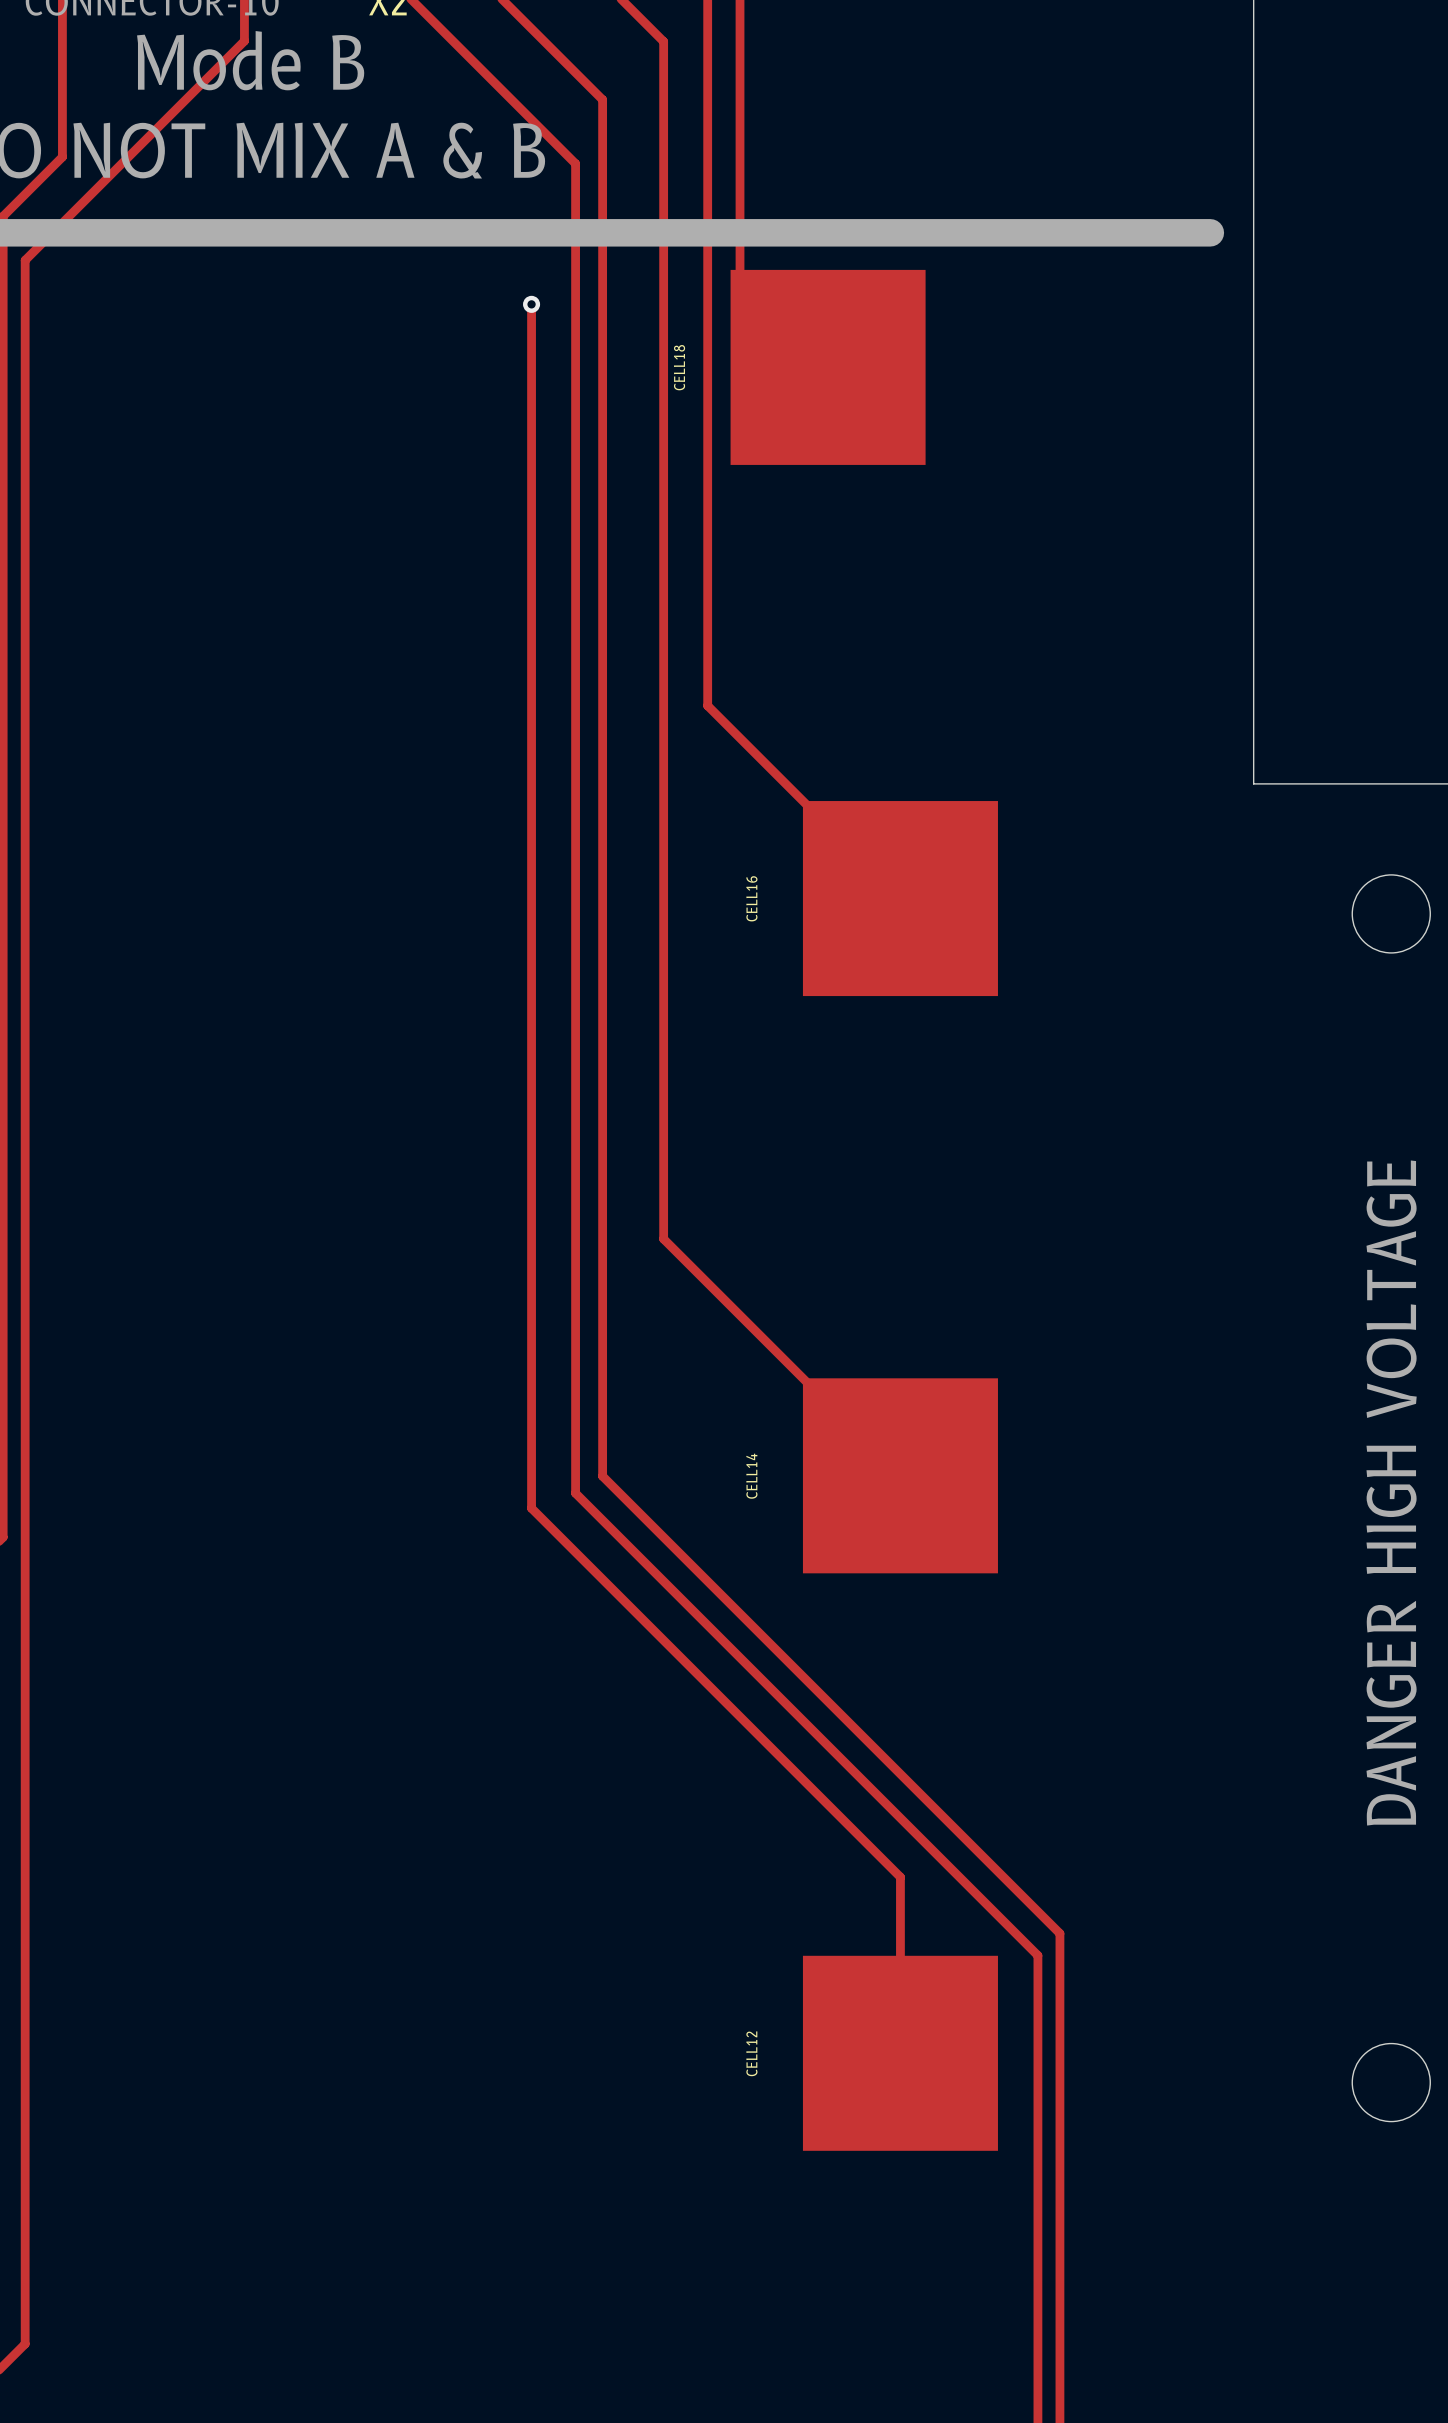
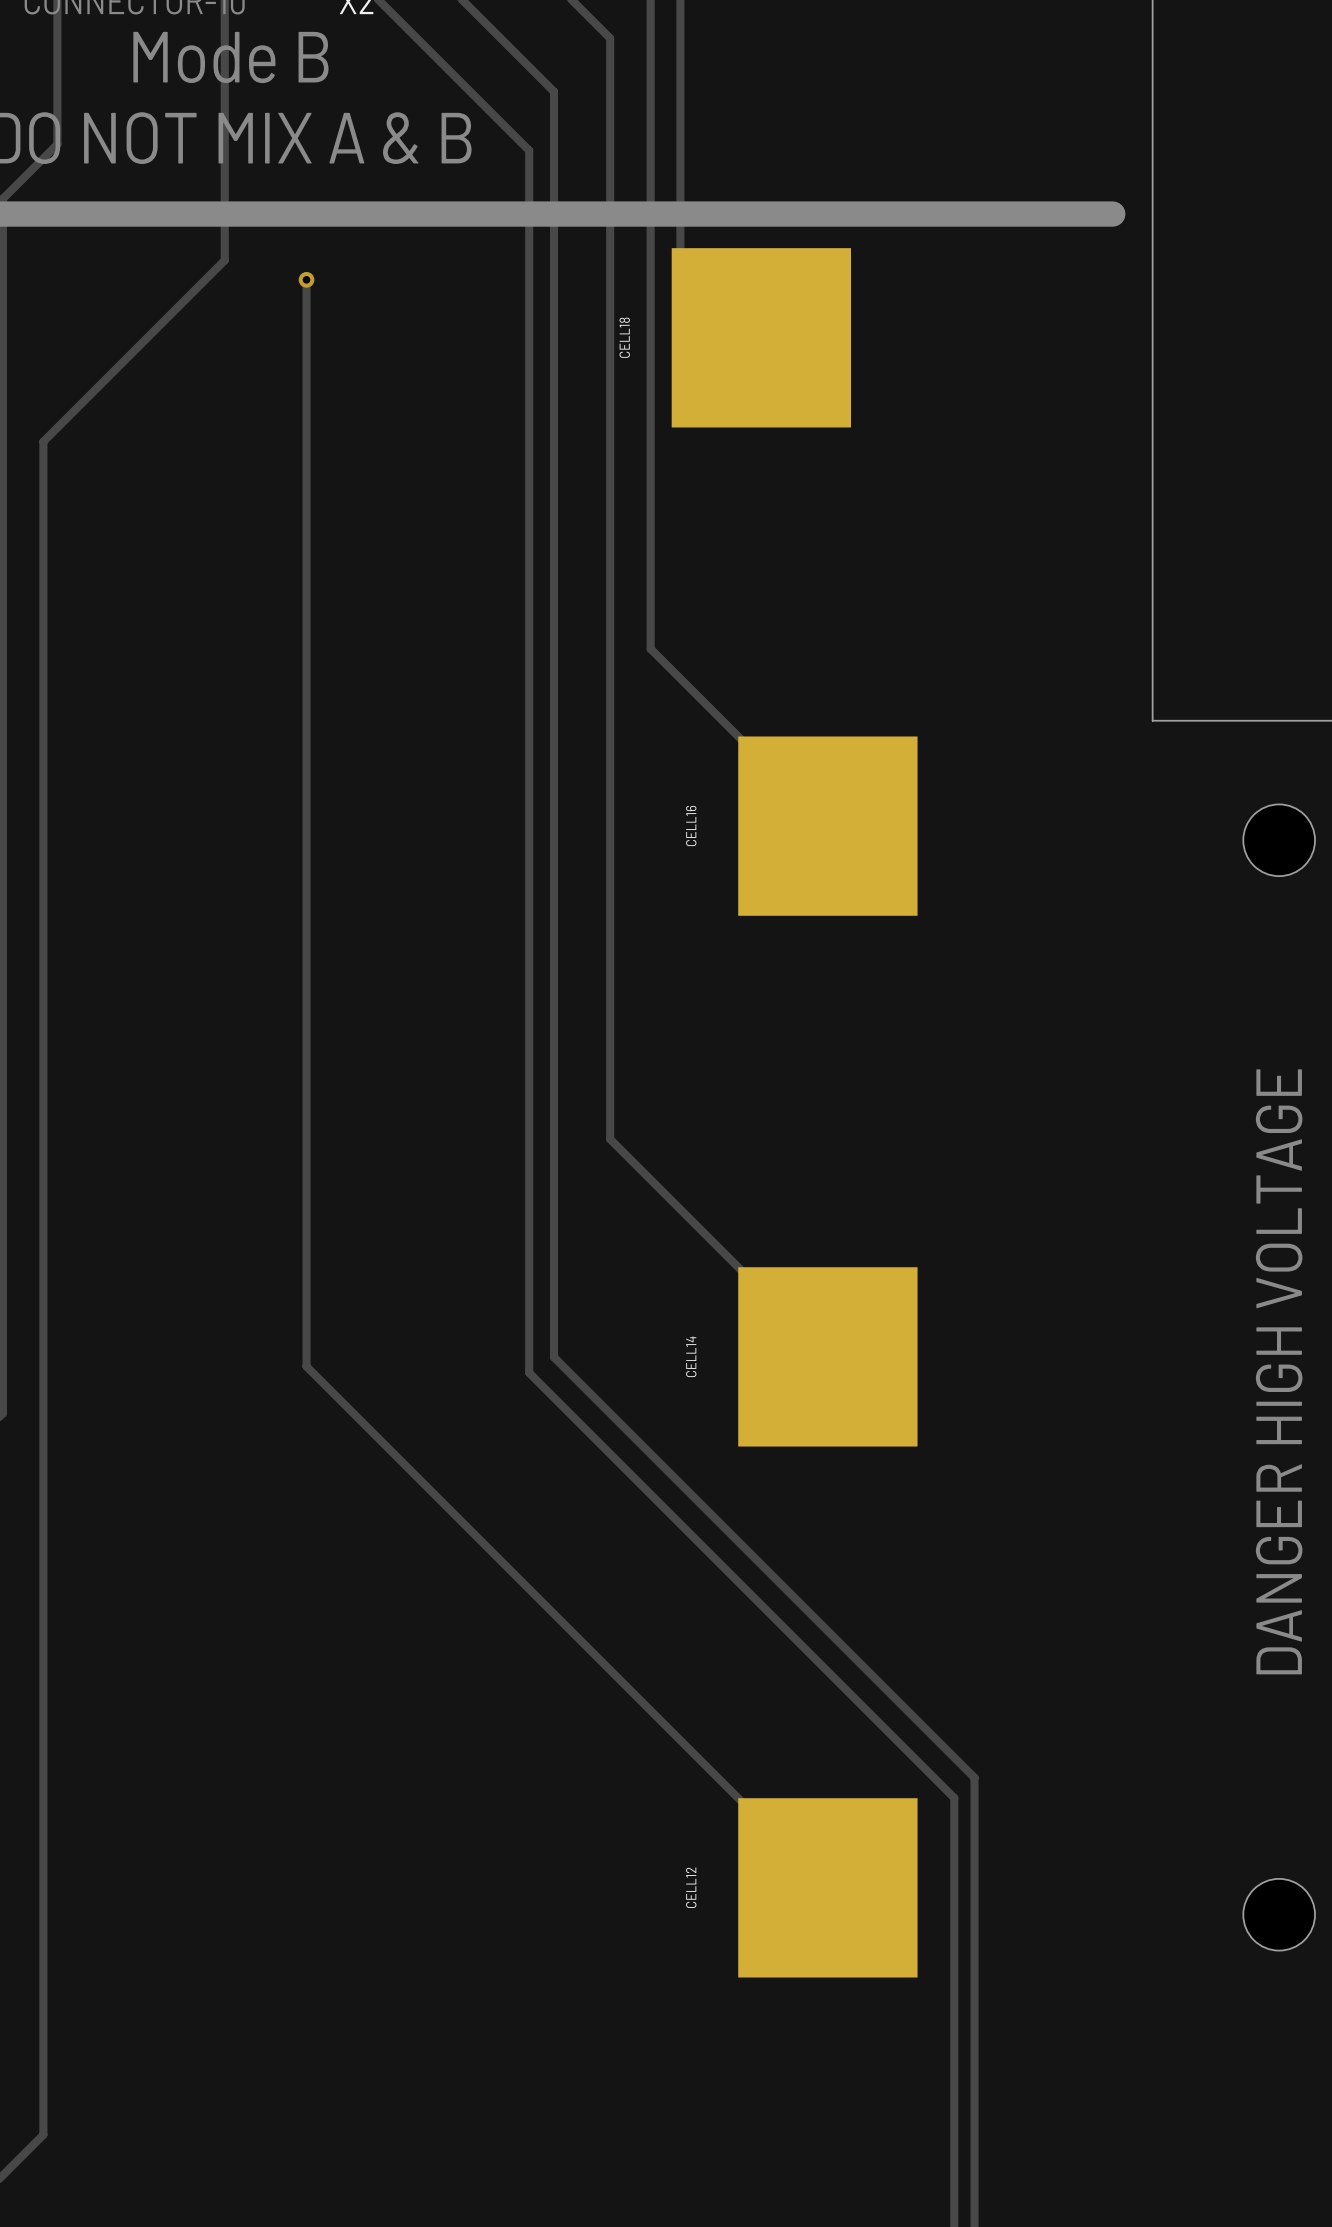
track: (244, 41) (25, 260) (25, 2343) -> (224, 37) (224, 260) (43, 441) (43, 2134) (23, 2155)
via: none -> (306, 279)
track: (531, 304) (531, 1508) (900, 1877) (900, 2053) -> (306, 279) (306, 1366) (827, 1887)
via: (531, 304) -> none

